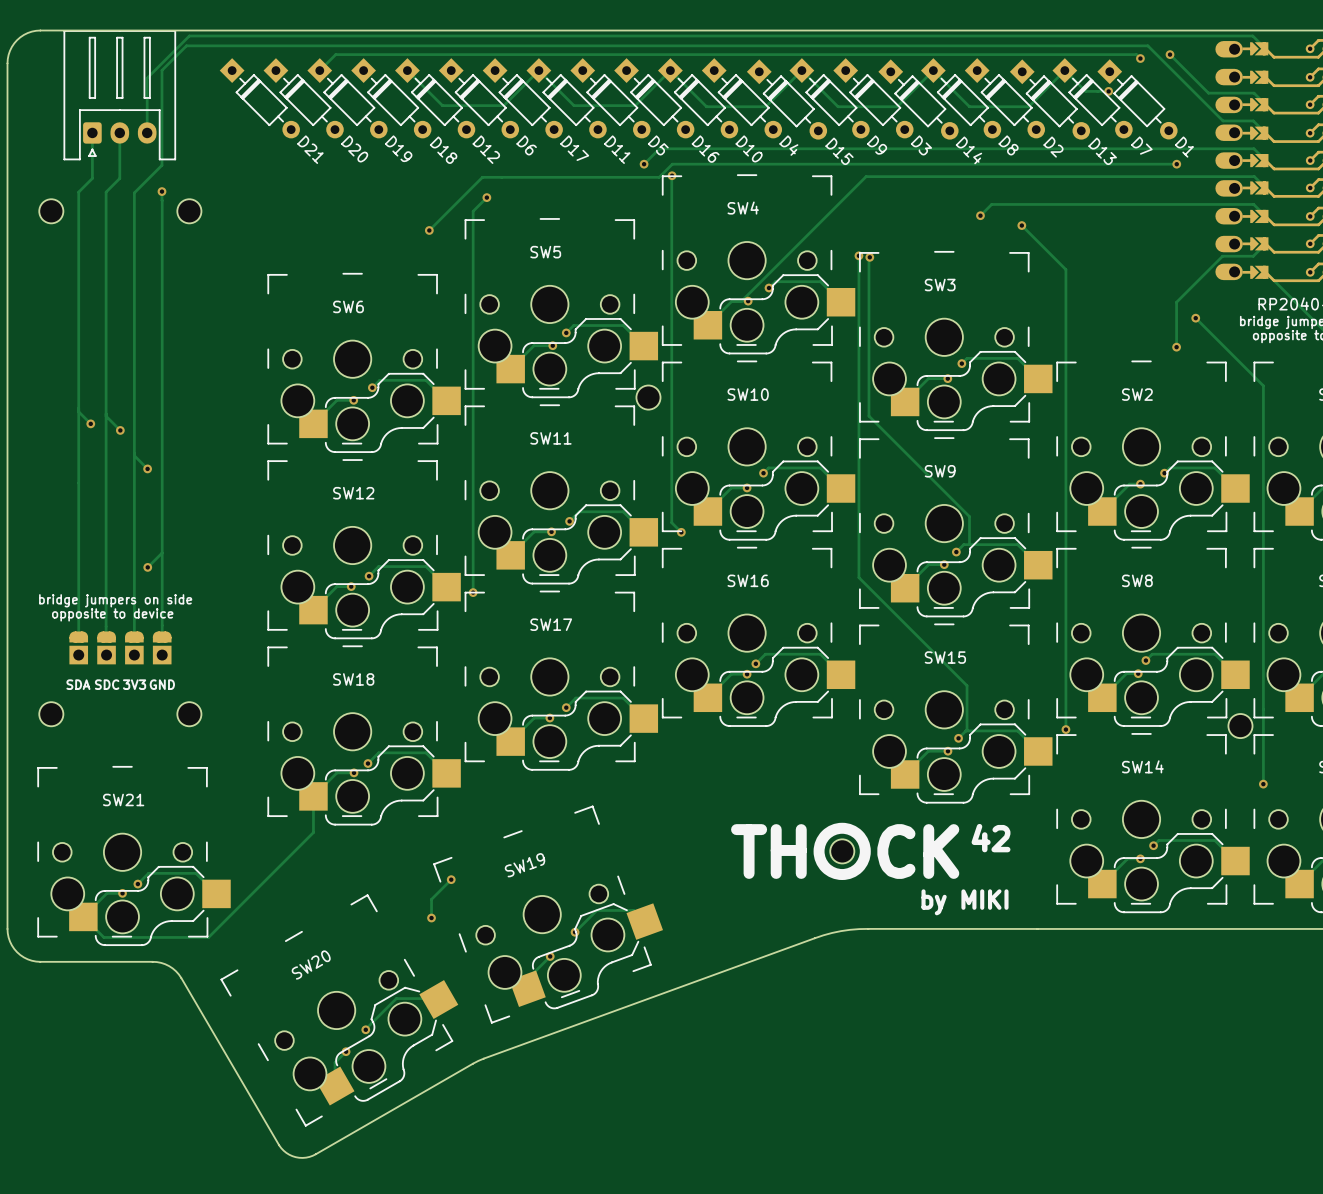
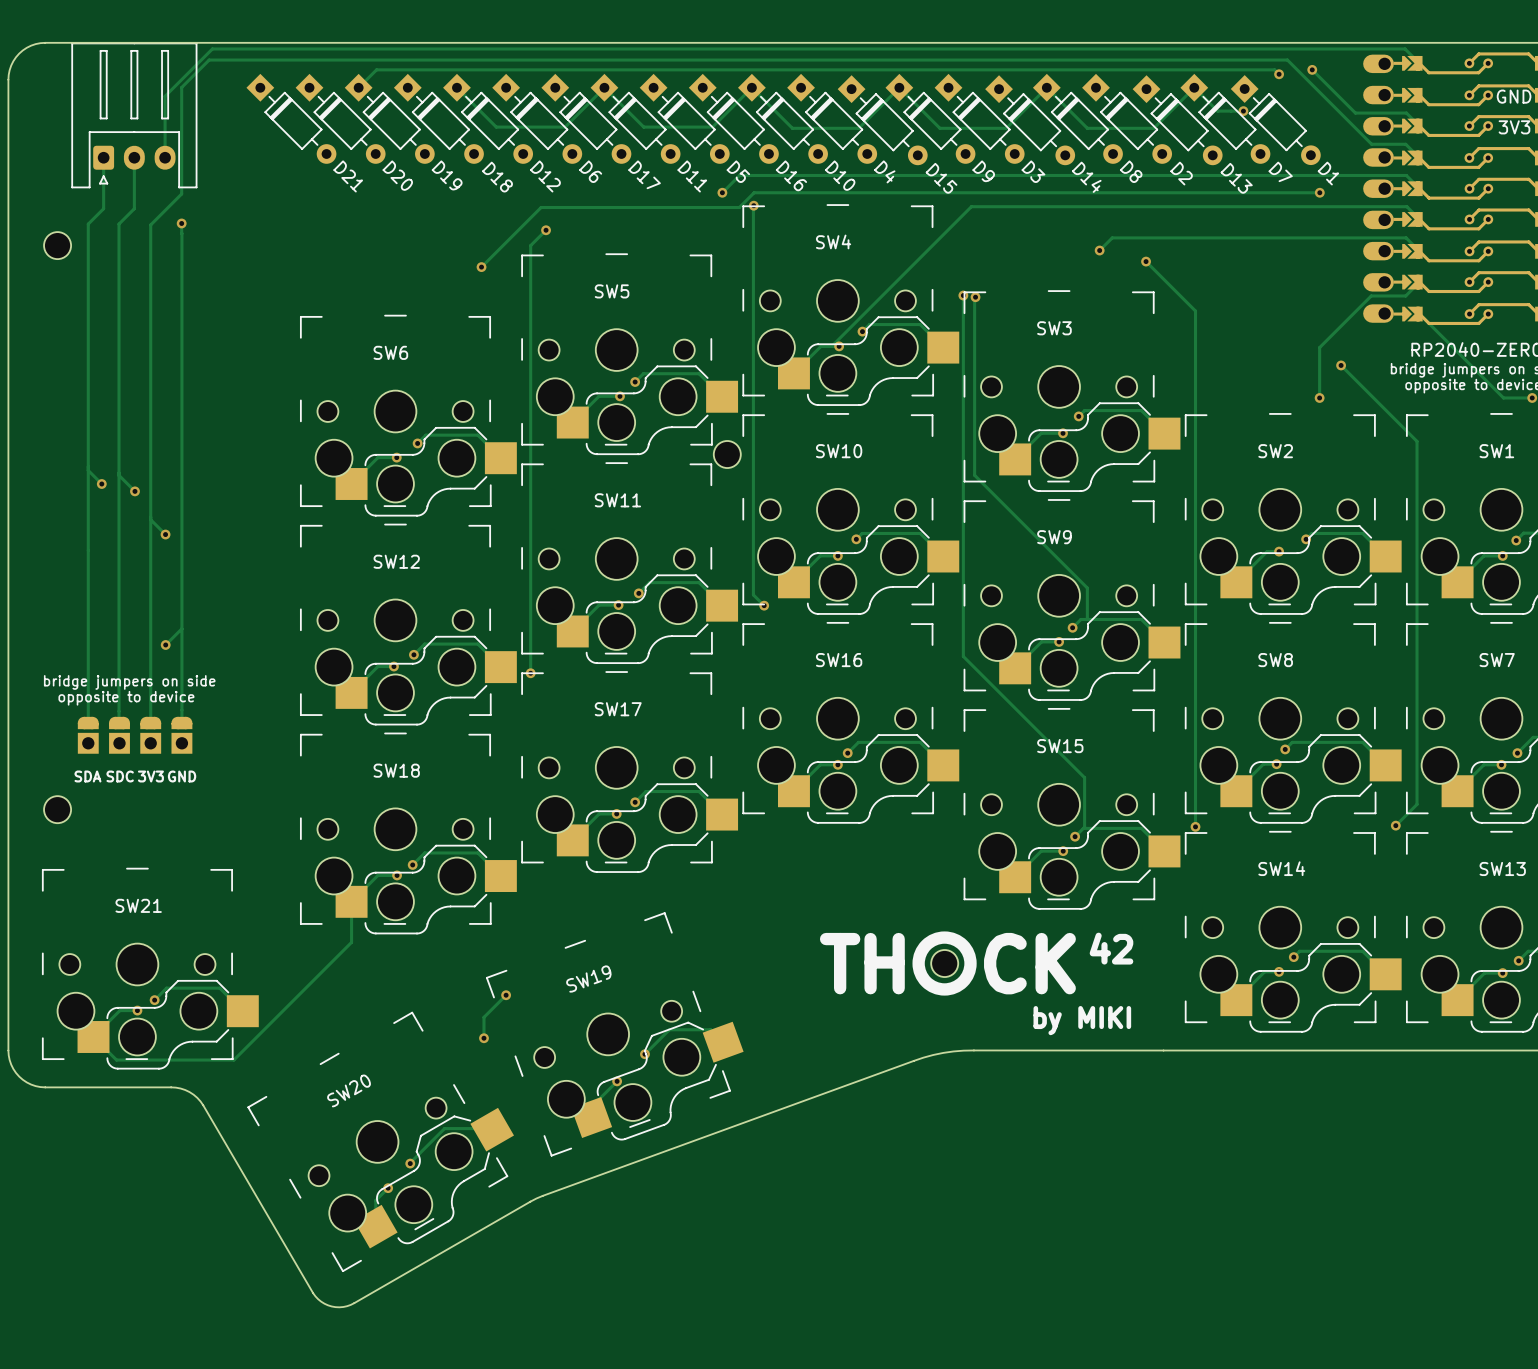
part: (189, 211) -> none
track: (1263, 709) (1263, 784) -> (1417, 804) (1395, 825)
part: (189, 714) -> none
part: (1240, 726) -> none
via position: (1263, 784) -> (1395, 825)

